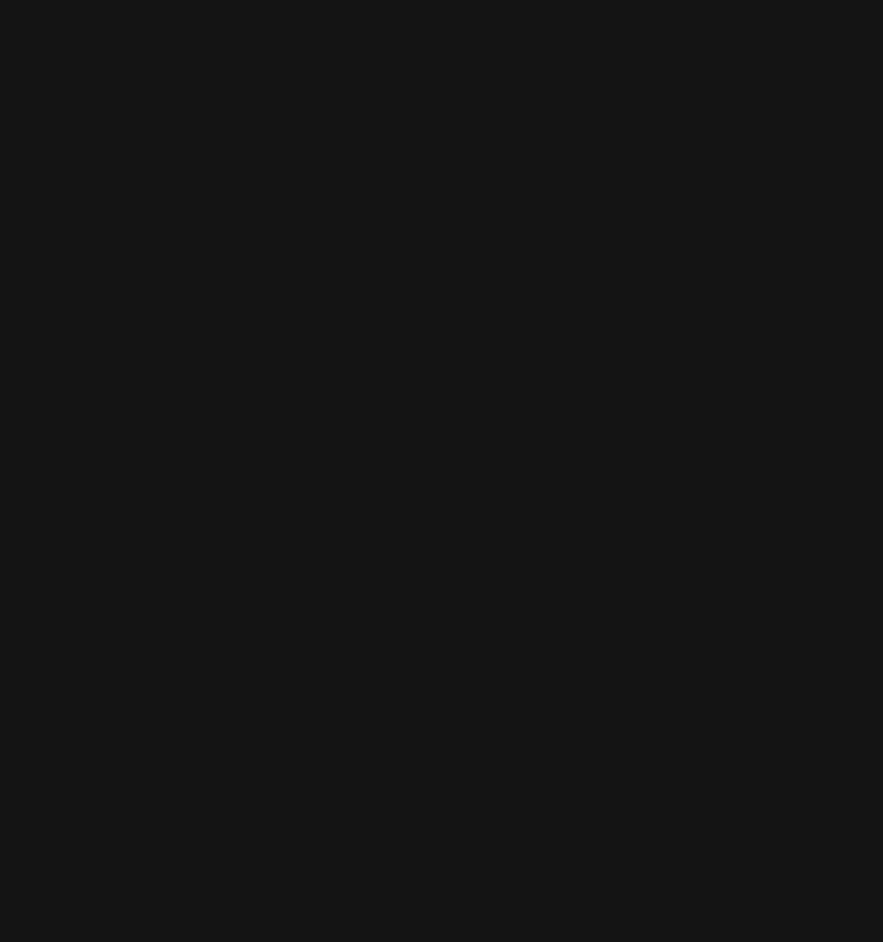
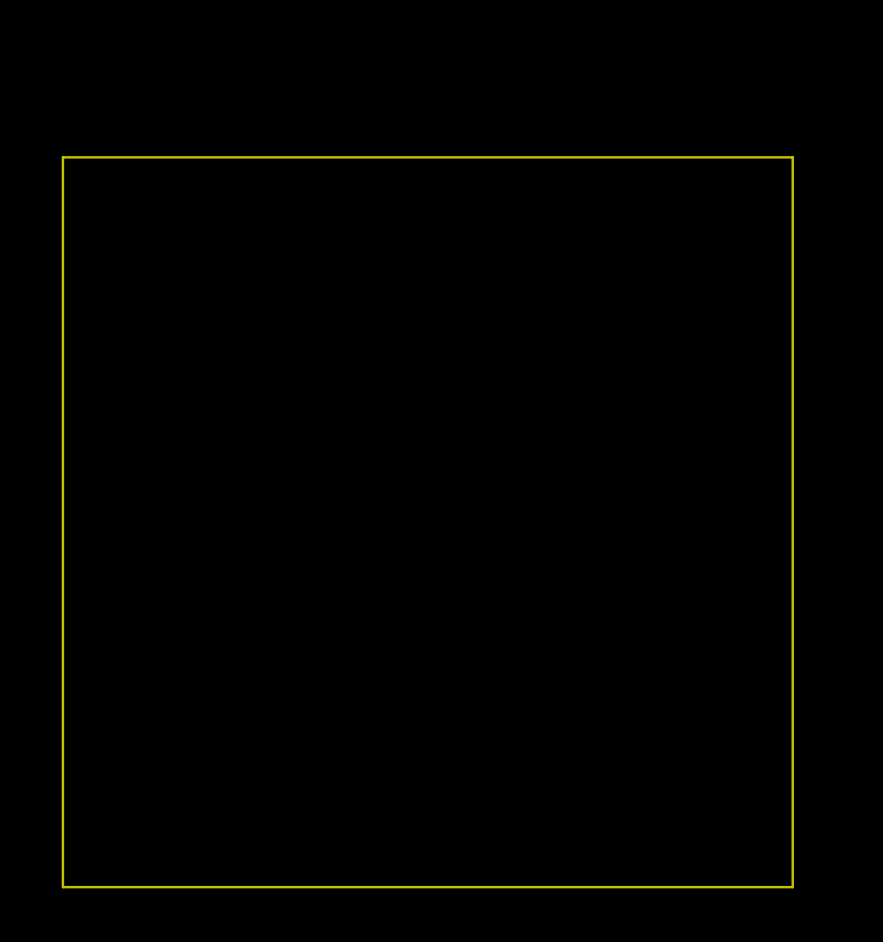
board edge: none -> (792, 157) (62, 157) (62, 887) (792, 887) (792, 157)

